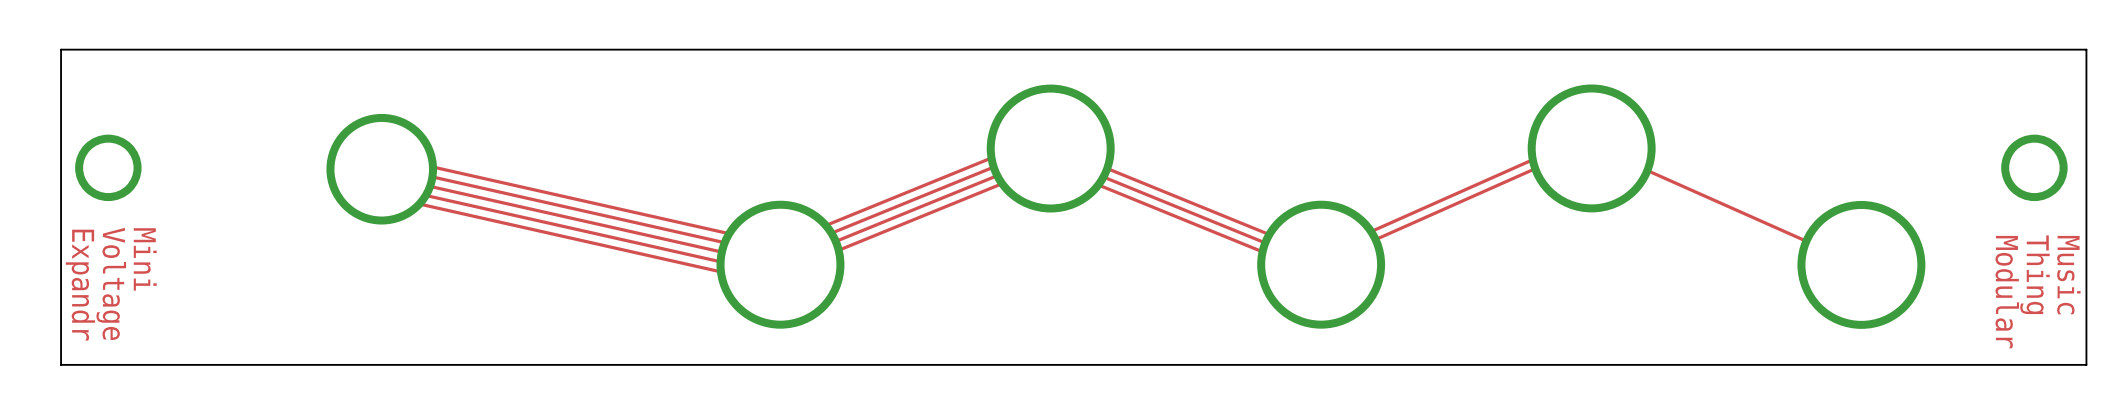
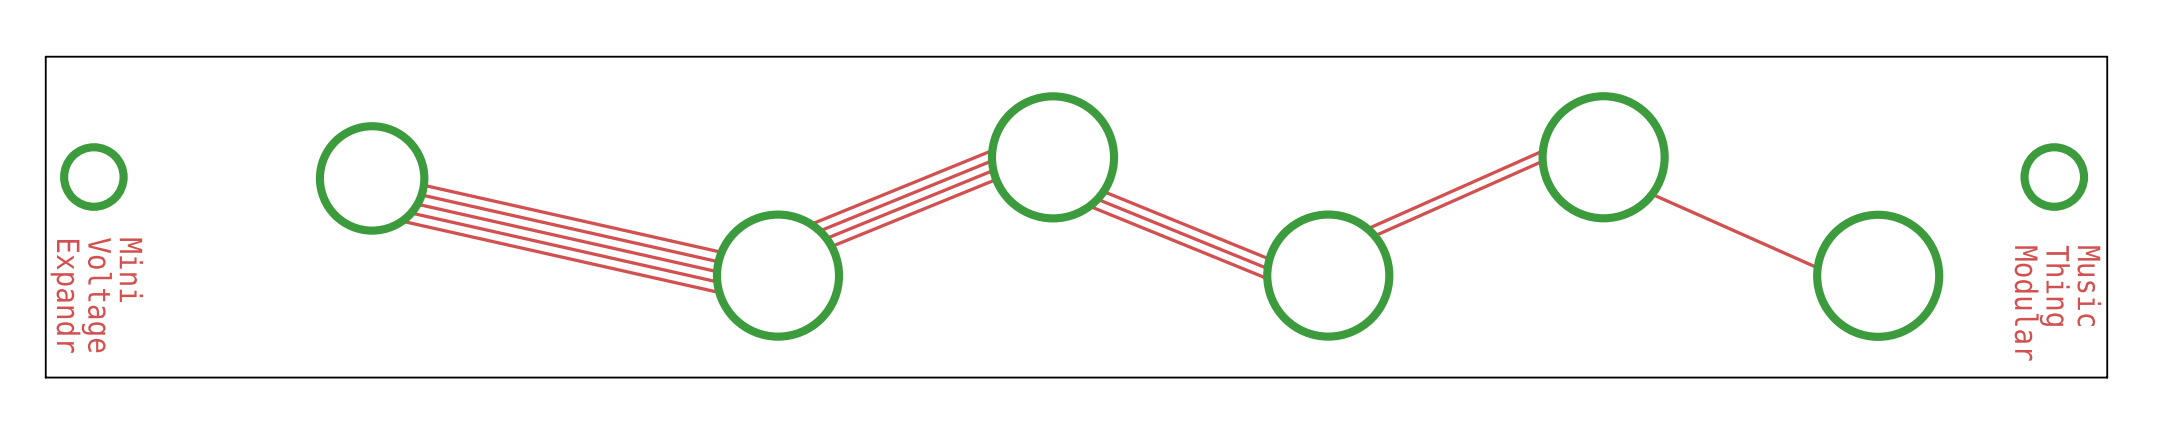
track: (1048, 134) (778, 244) (378, 154) (378, 184) (778, 274) (1048, 164) (1318, 274) -> (1010, 143) (735, 255) (327, 163) (327, 194) (735, 285) (1010, 173) (1285, 285)
track: (1589, 134) (1318, 254) (1048, 144) (778, 254) (378, 164) -> (1560, 143) (1285, 265) (1010, 153) (735, 265) (327, 173)
track: (378, 174) (778, 264) (1048, 154) (1318, 264) (1589, 144) (1859, 264) -> (327, 184) (735, 275) (1010, 163) (1285, 275) (1560, 153) (1835, 275)
track: (378, 194) (778, 284) -> (327, 204) (735, 296)

